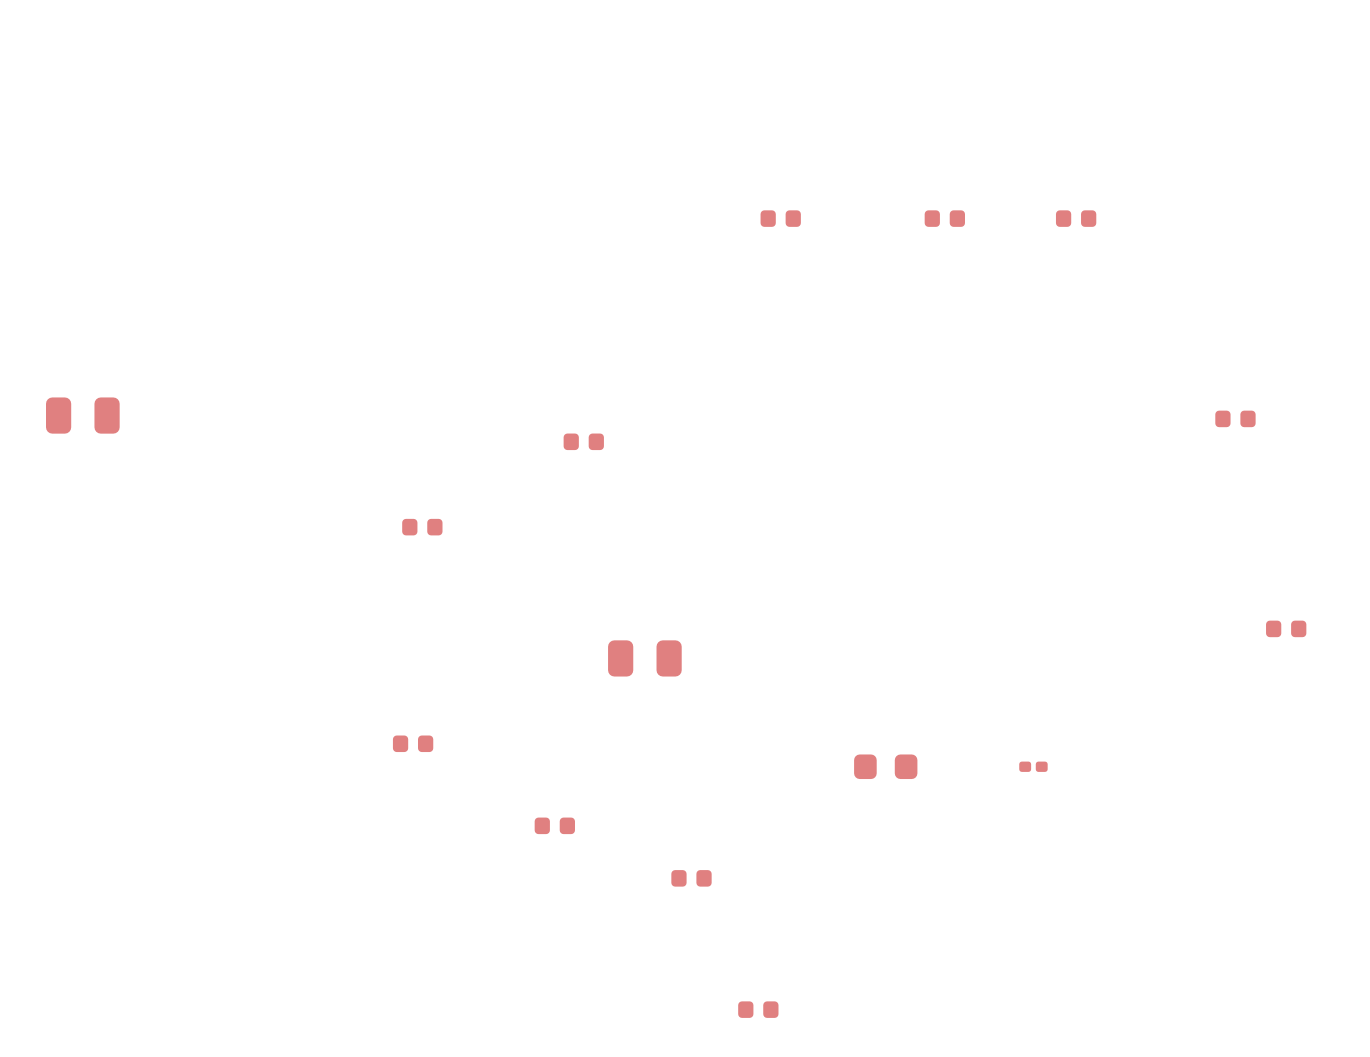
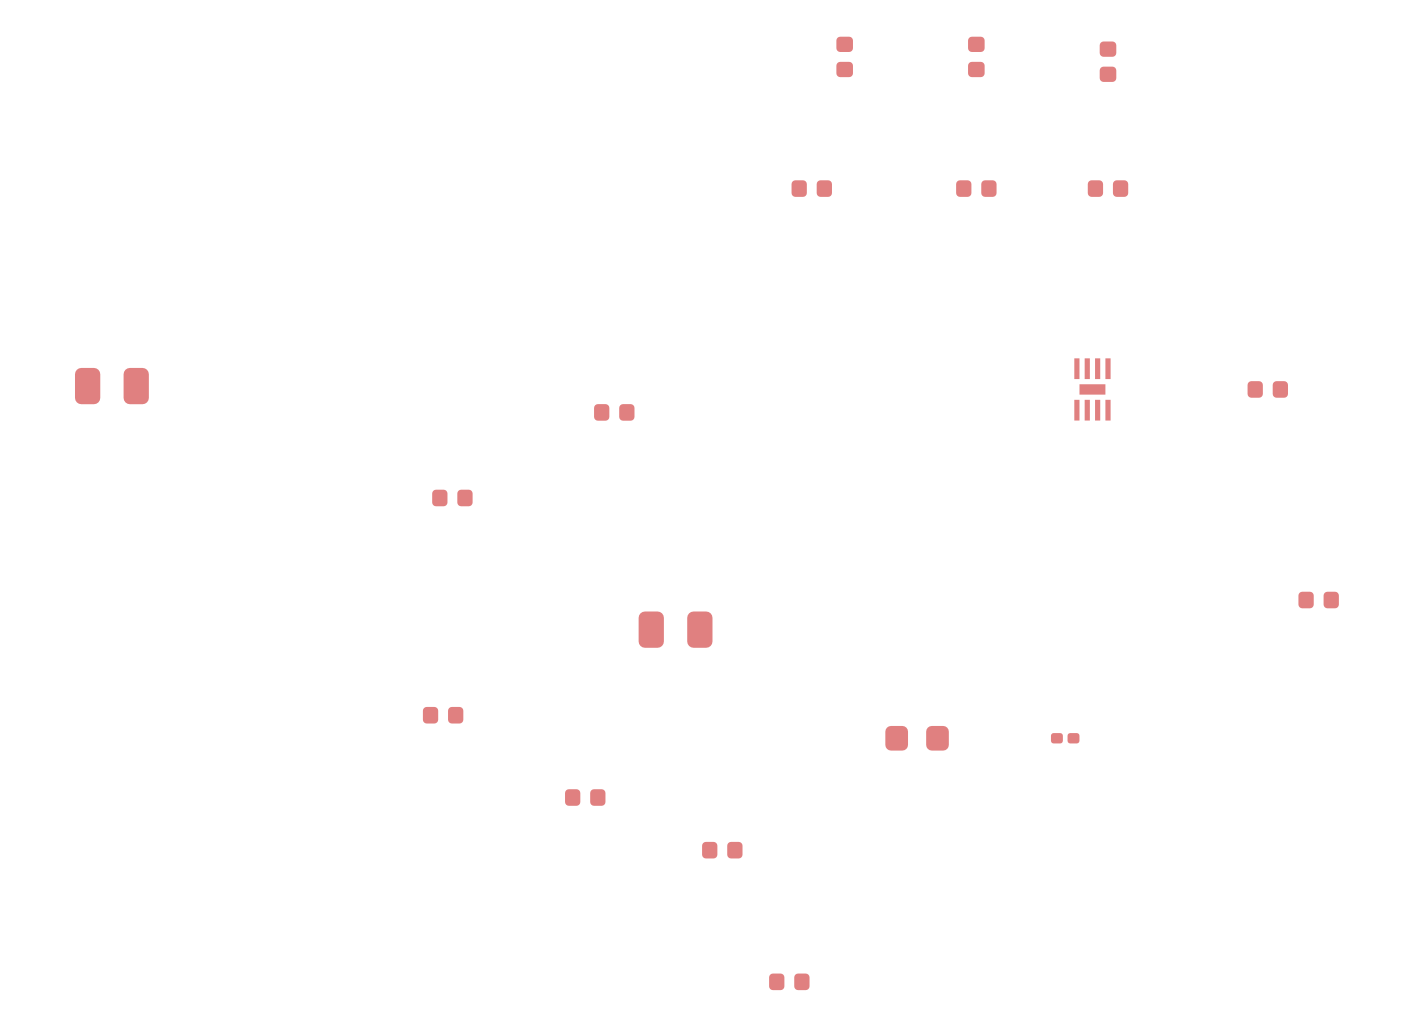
part: none -> (844, 56)
part: none -> (976, 56)
part: none -> (1108, 61)
part: none -> (1092, 389)

